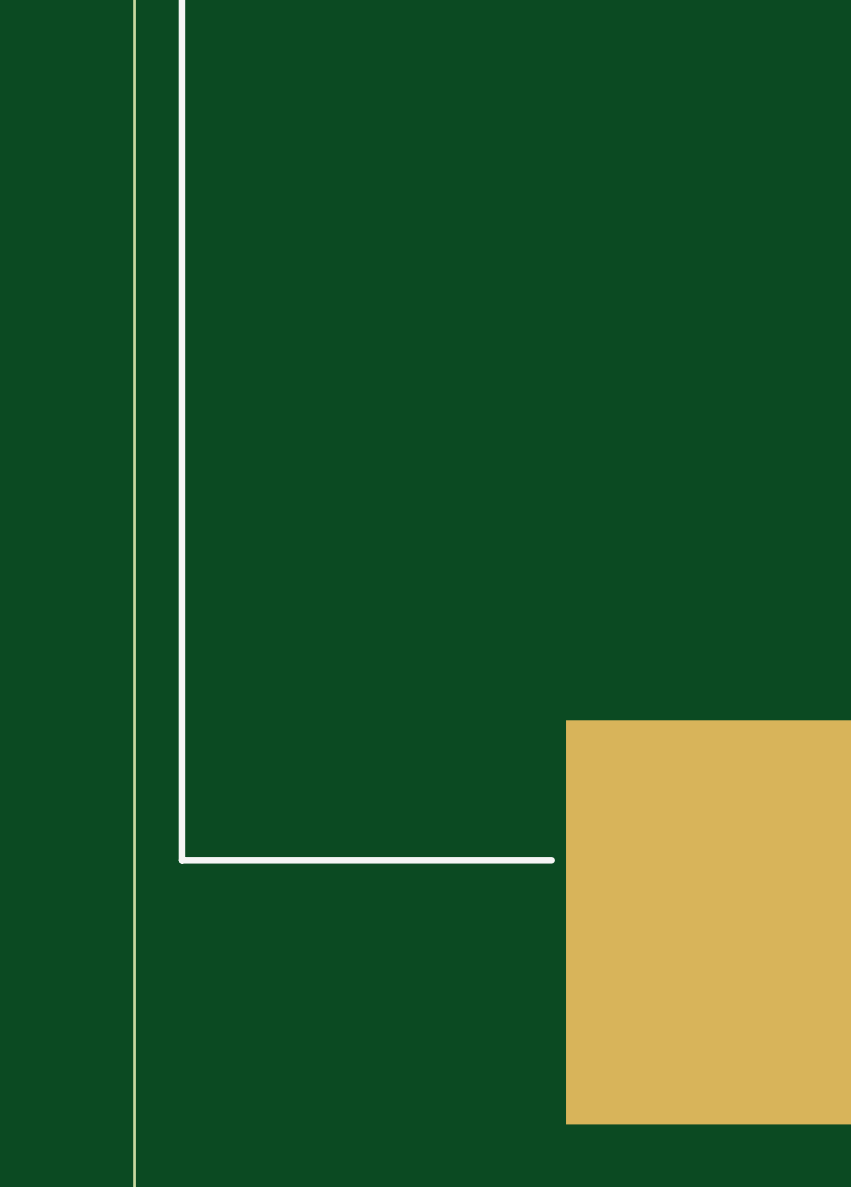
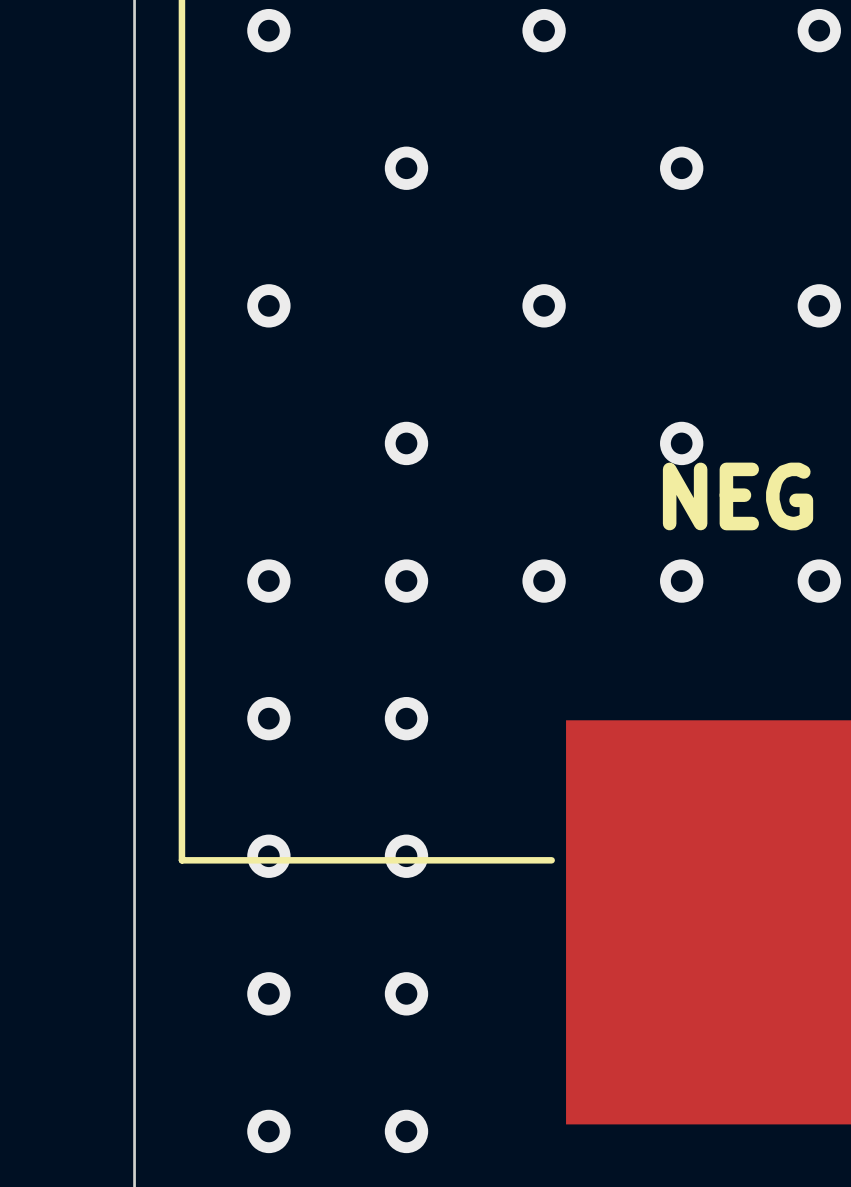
via: none -> (268, 30)
via: none -> (544, 30)
via: none -> (819, 30)
via: none -> (406, 168)
via: none -> (681, 168)
via: none -> (268, 305)
via: none -> (544, 305)
via: none -> (819, 305)
via: none -> (406, 443)
via: none -> (681, 443)
text: none -> NEG (738, 496)
via: none -> (268, 581)
via: none -> (406, 581)
via: none -> (544, 581)
via: none -> (681, 581)
via: none -> (819, 581)
via: none -> (268, 718)
via: none -> (406, 718)
via: none -> (268, 856)
via: none -> (406, 856)
via: none -> (268, 993)
via: none -> (406, 993)
via: none -> (268, 1131)
via: none -> (406, 1131)

